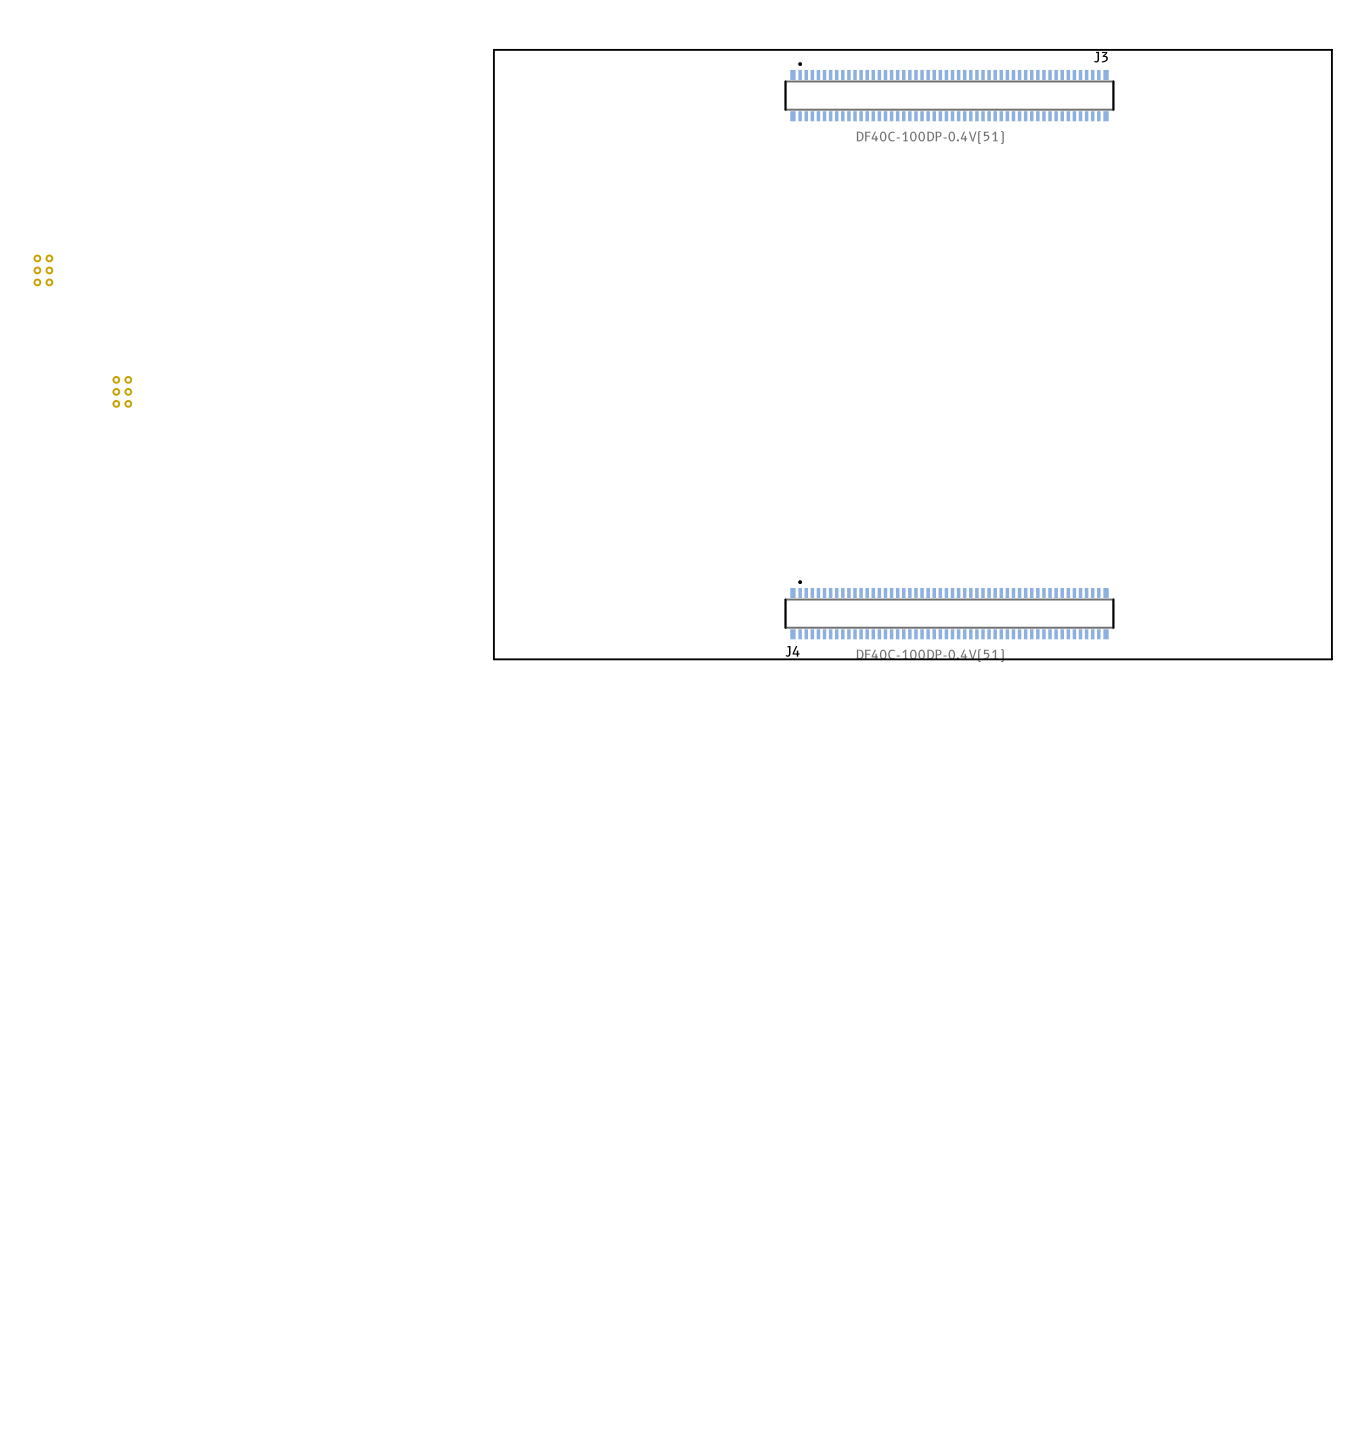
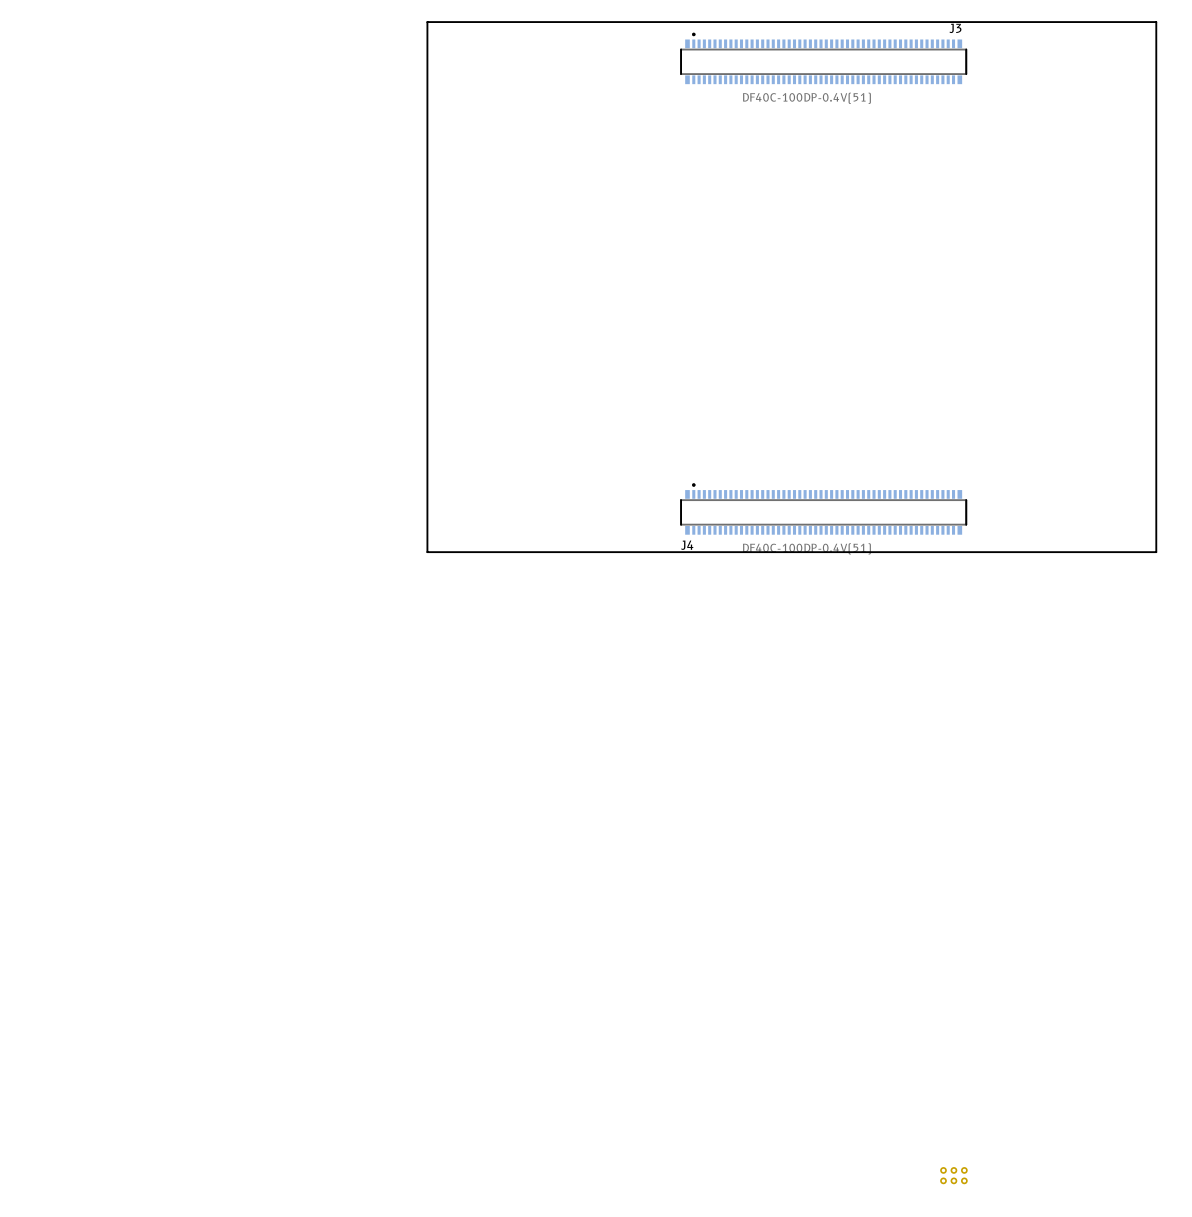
part: (43, 270) -> none
part: (122, 391) -> none
part: none -> (953, 1175)

